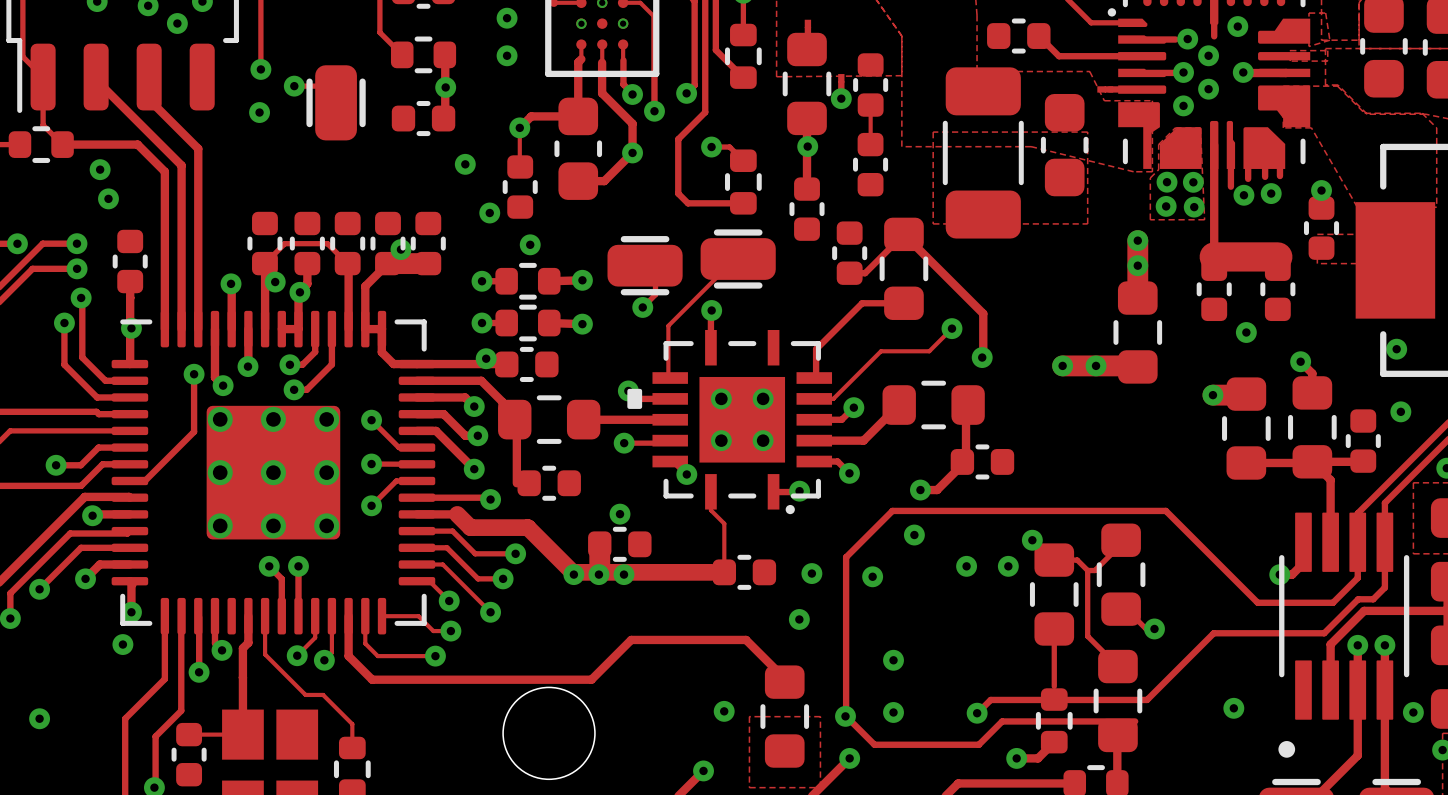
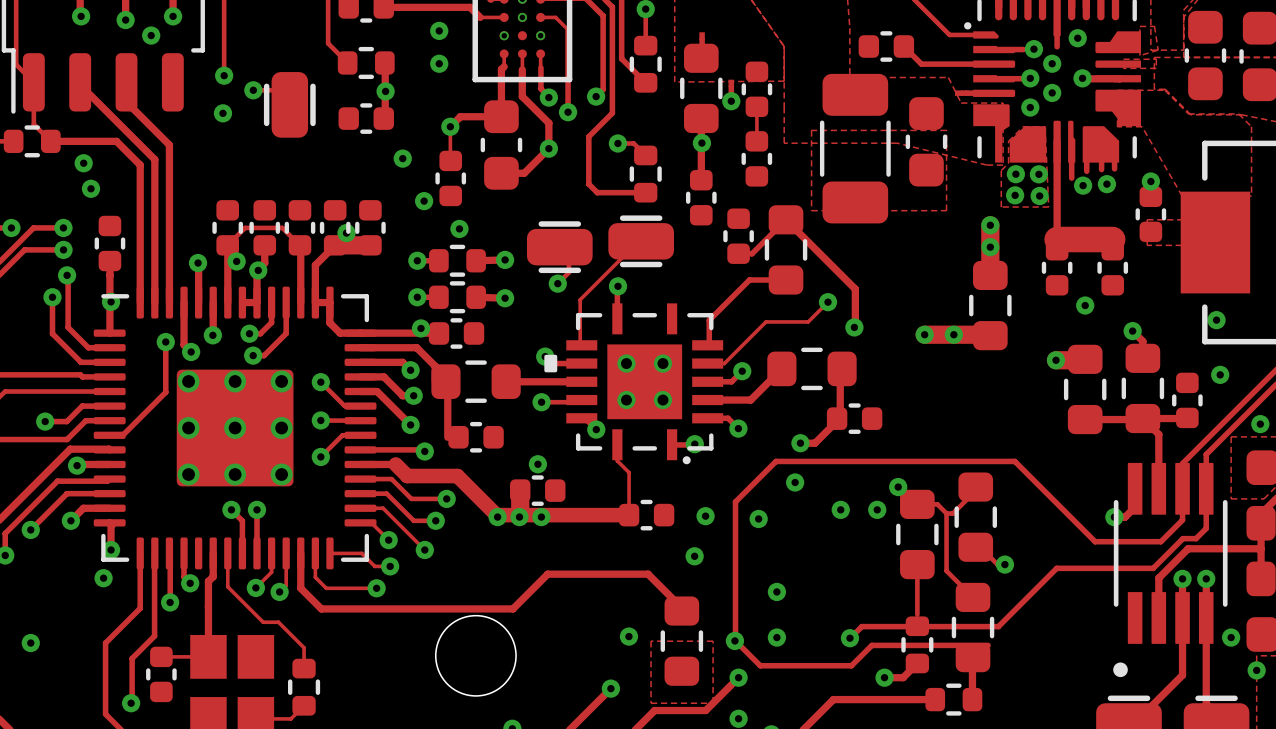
via: (1233, 708) -> none

